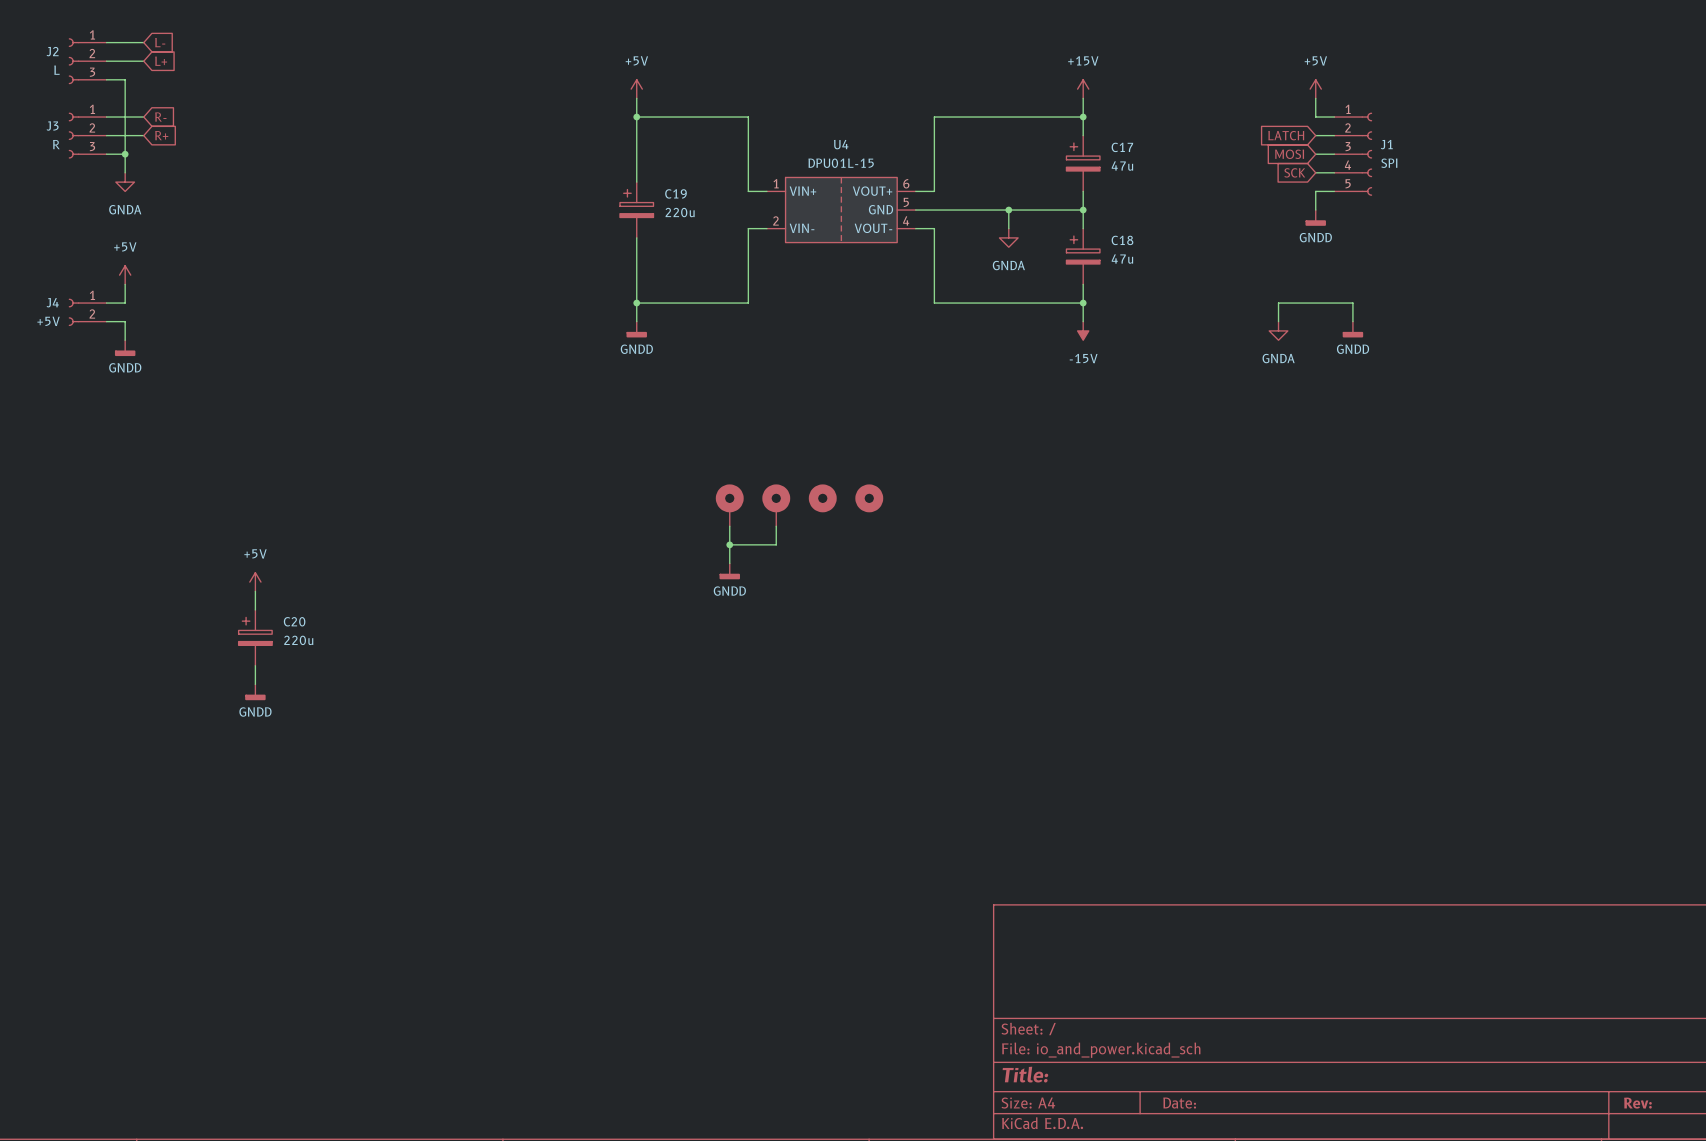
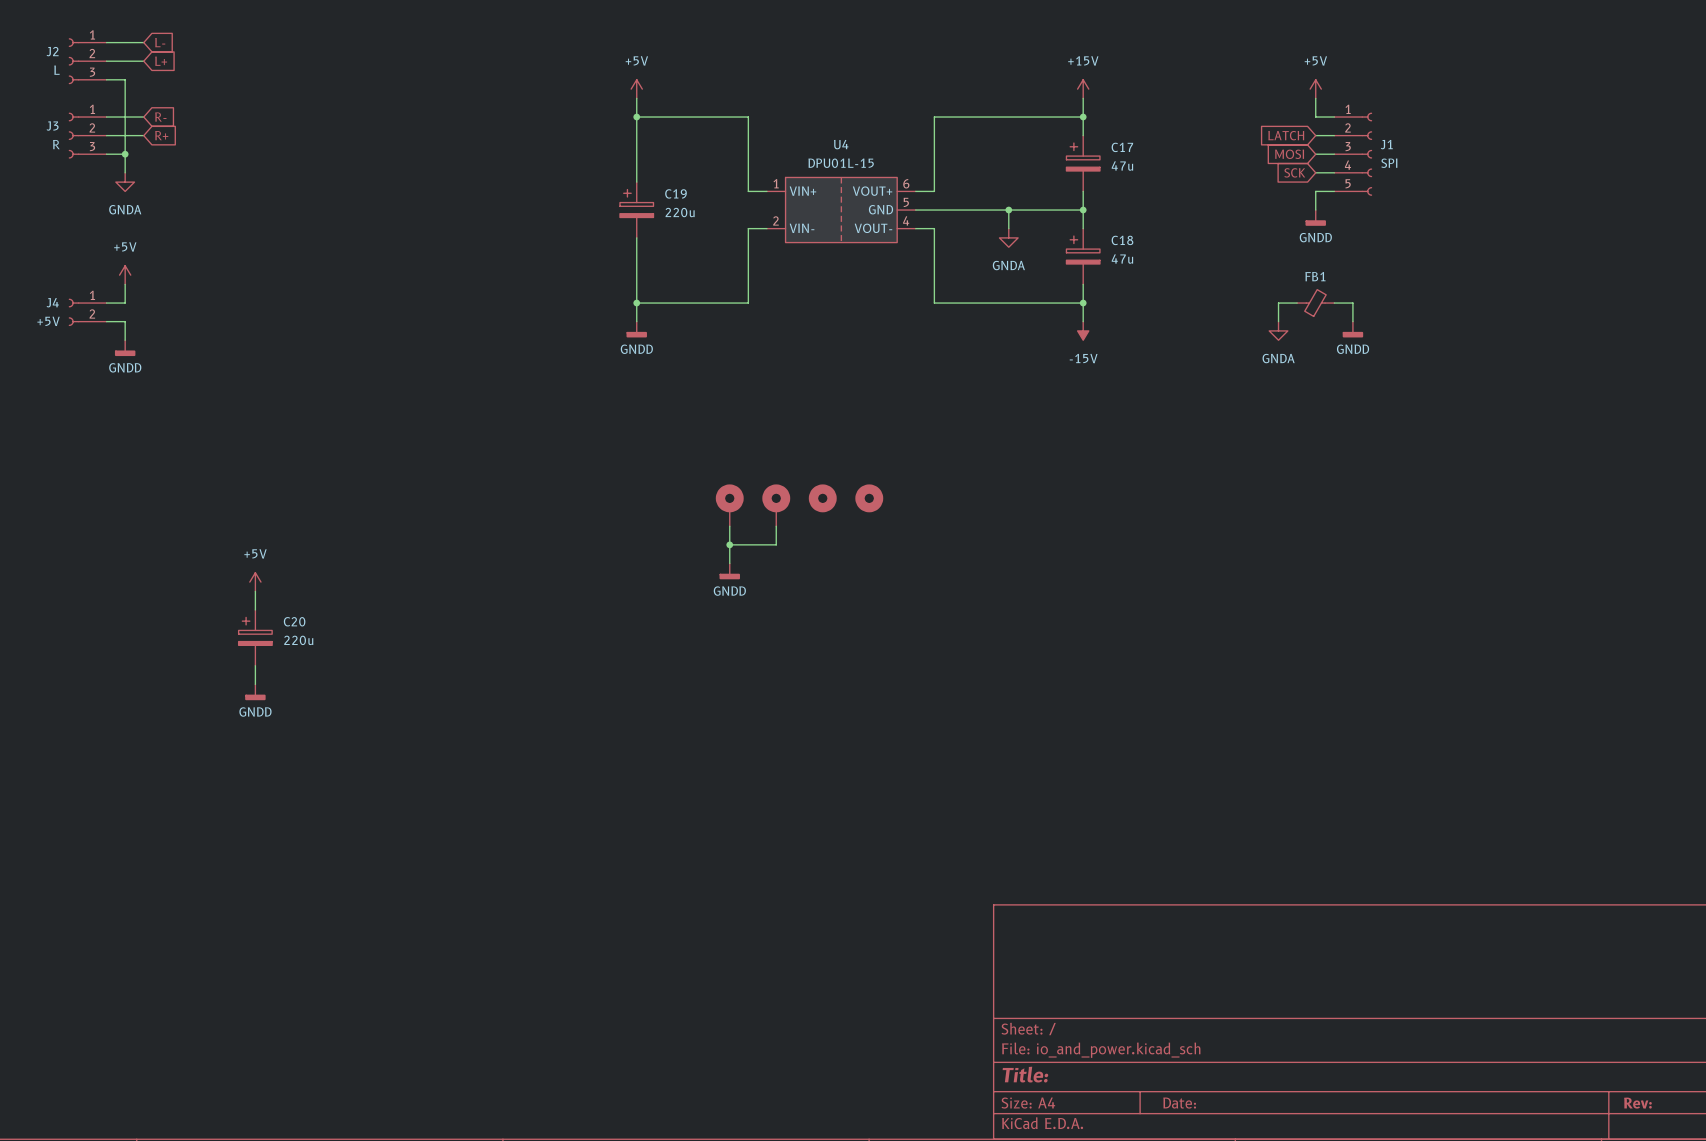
FB1: none -> (1315, 303)

